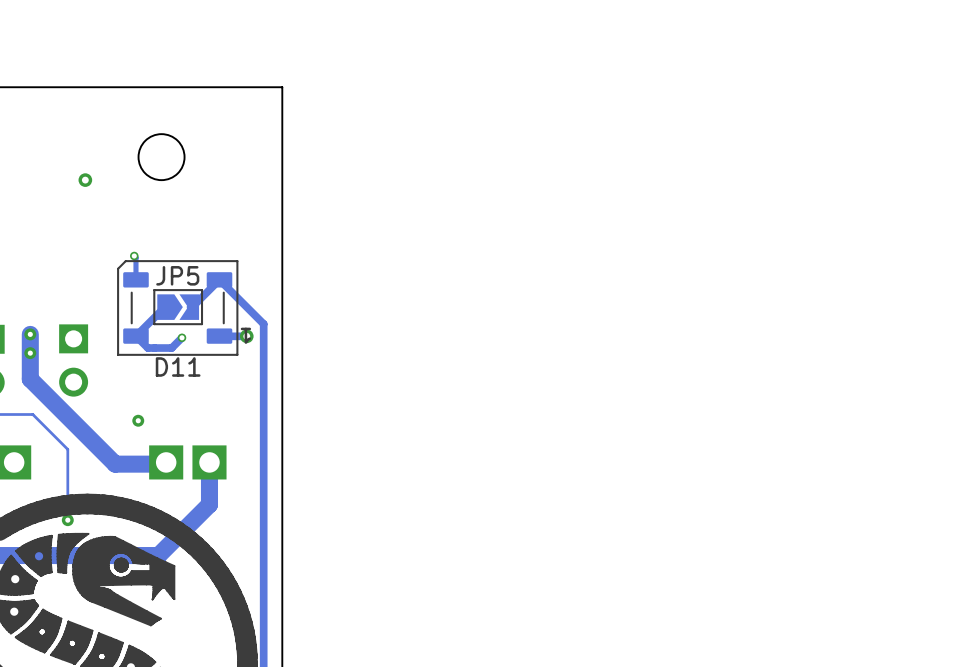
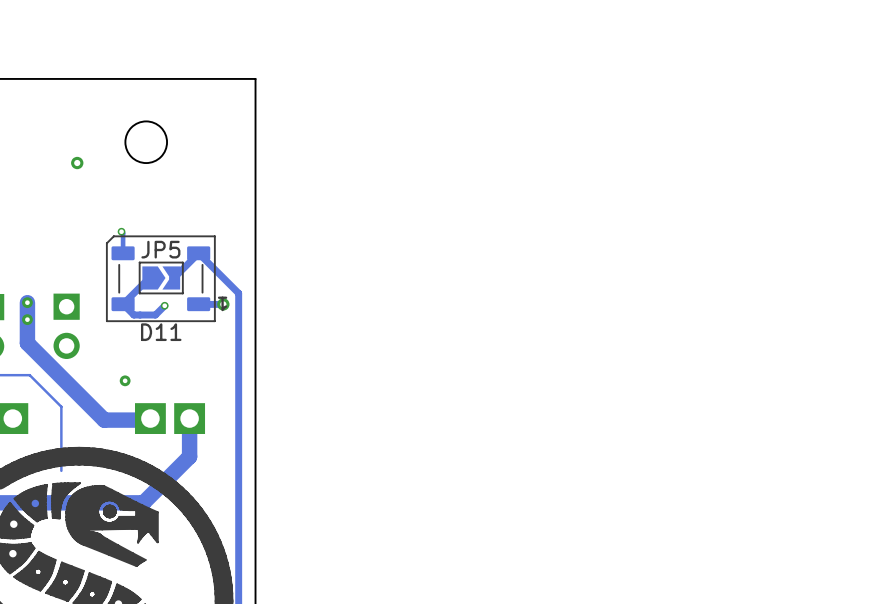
via: (67, 520) -> none

